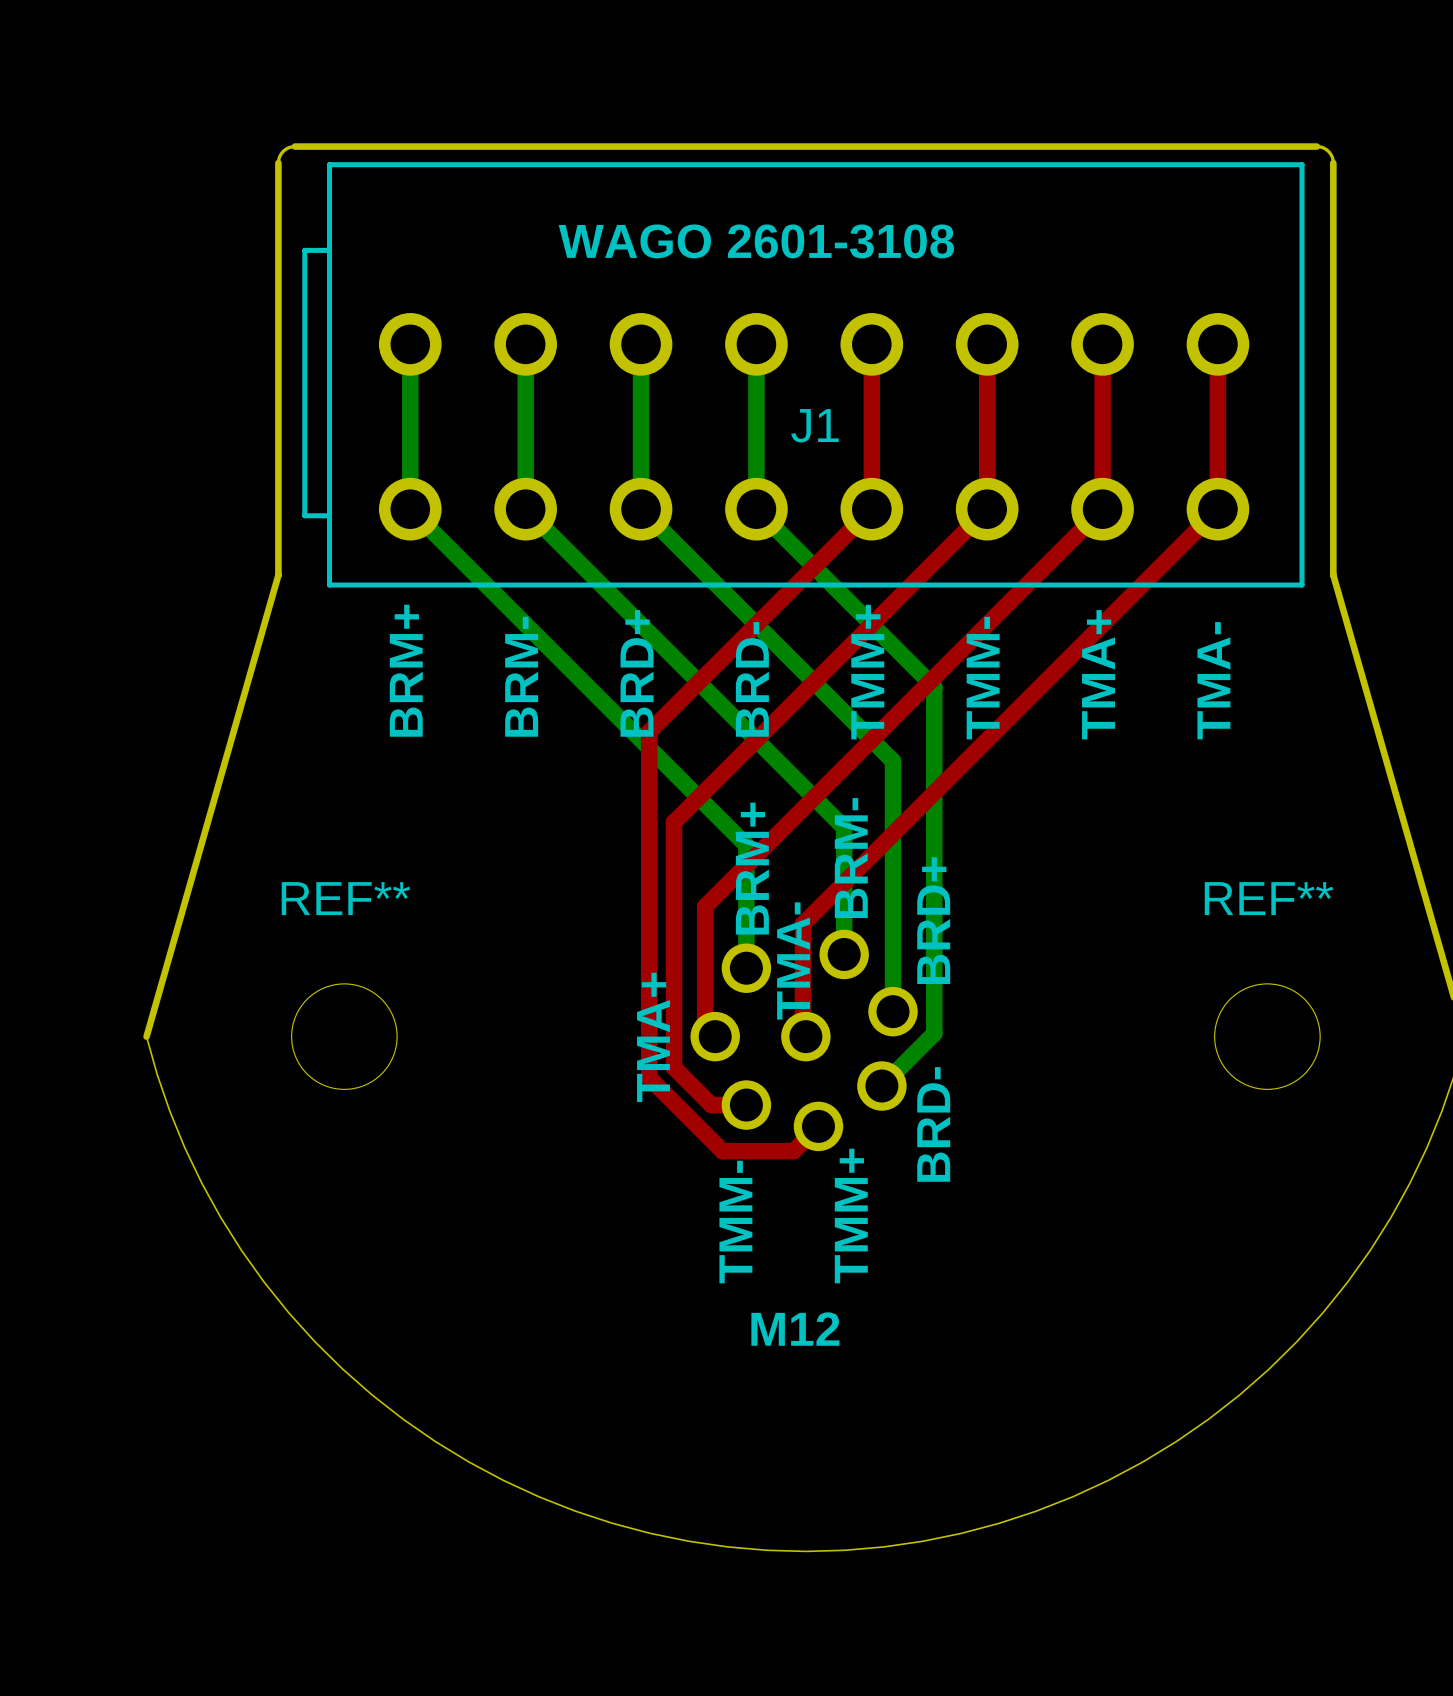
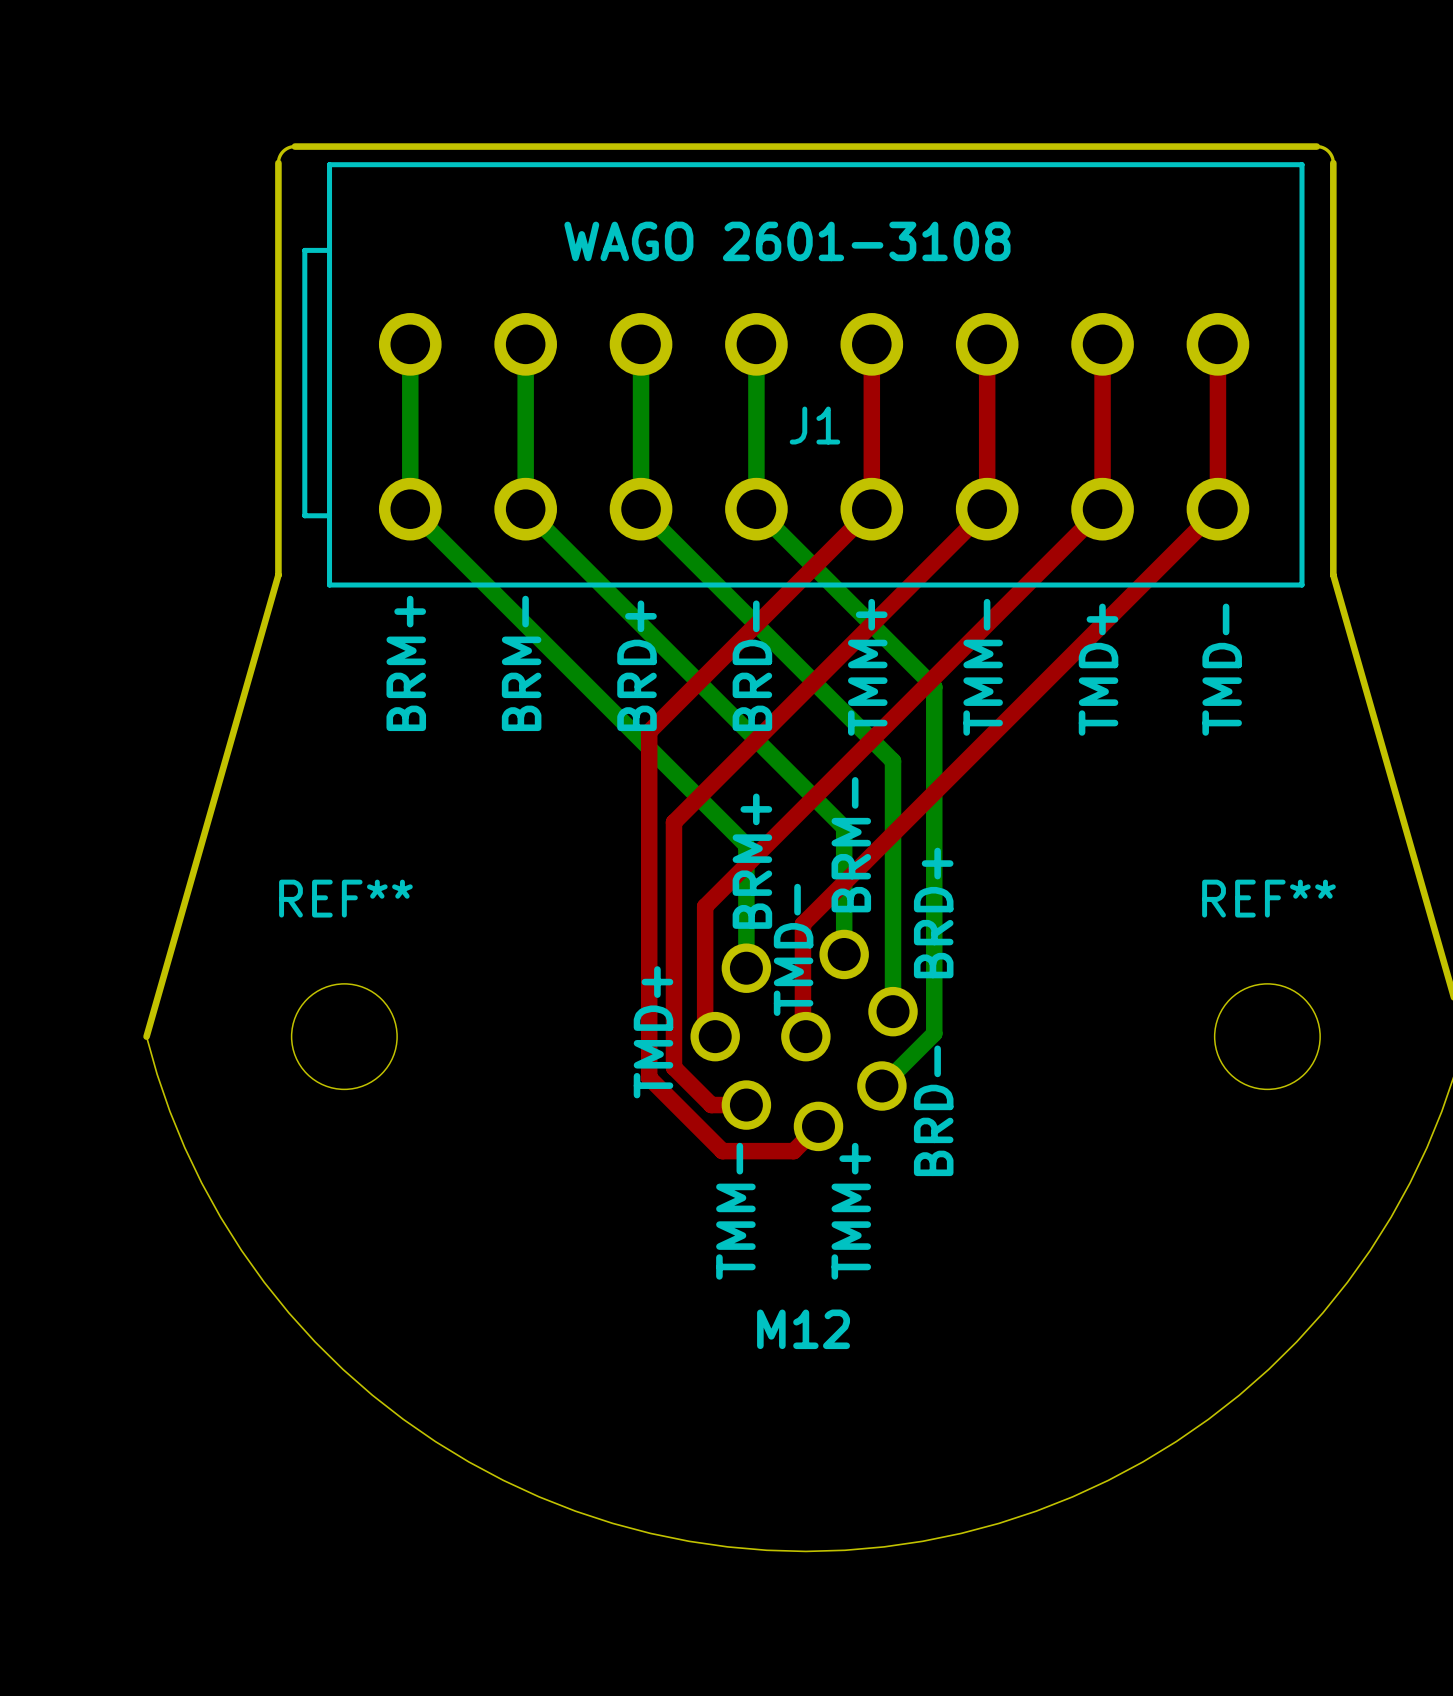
text: TMA+ (1098, 674) -> TMD+ (1098, 669)
text: TMA- (1213, 680) -> TMD- (1222, 669)
text: TMA- (793, 960) -> TMD- (793, 949)
text: TMA+ (653, 1037) -> TMD+ (653, 1032)

